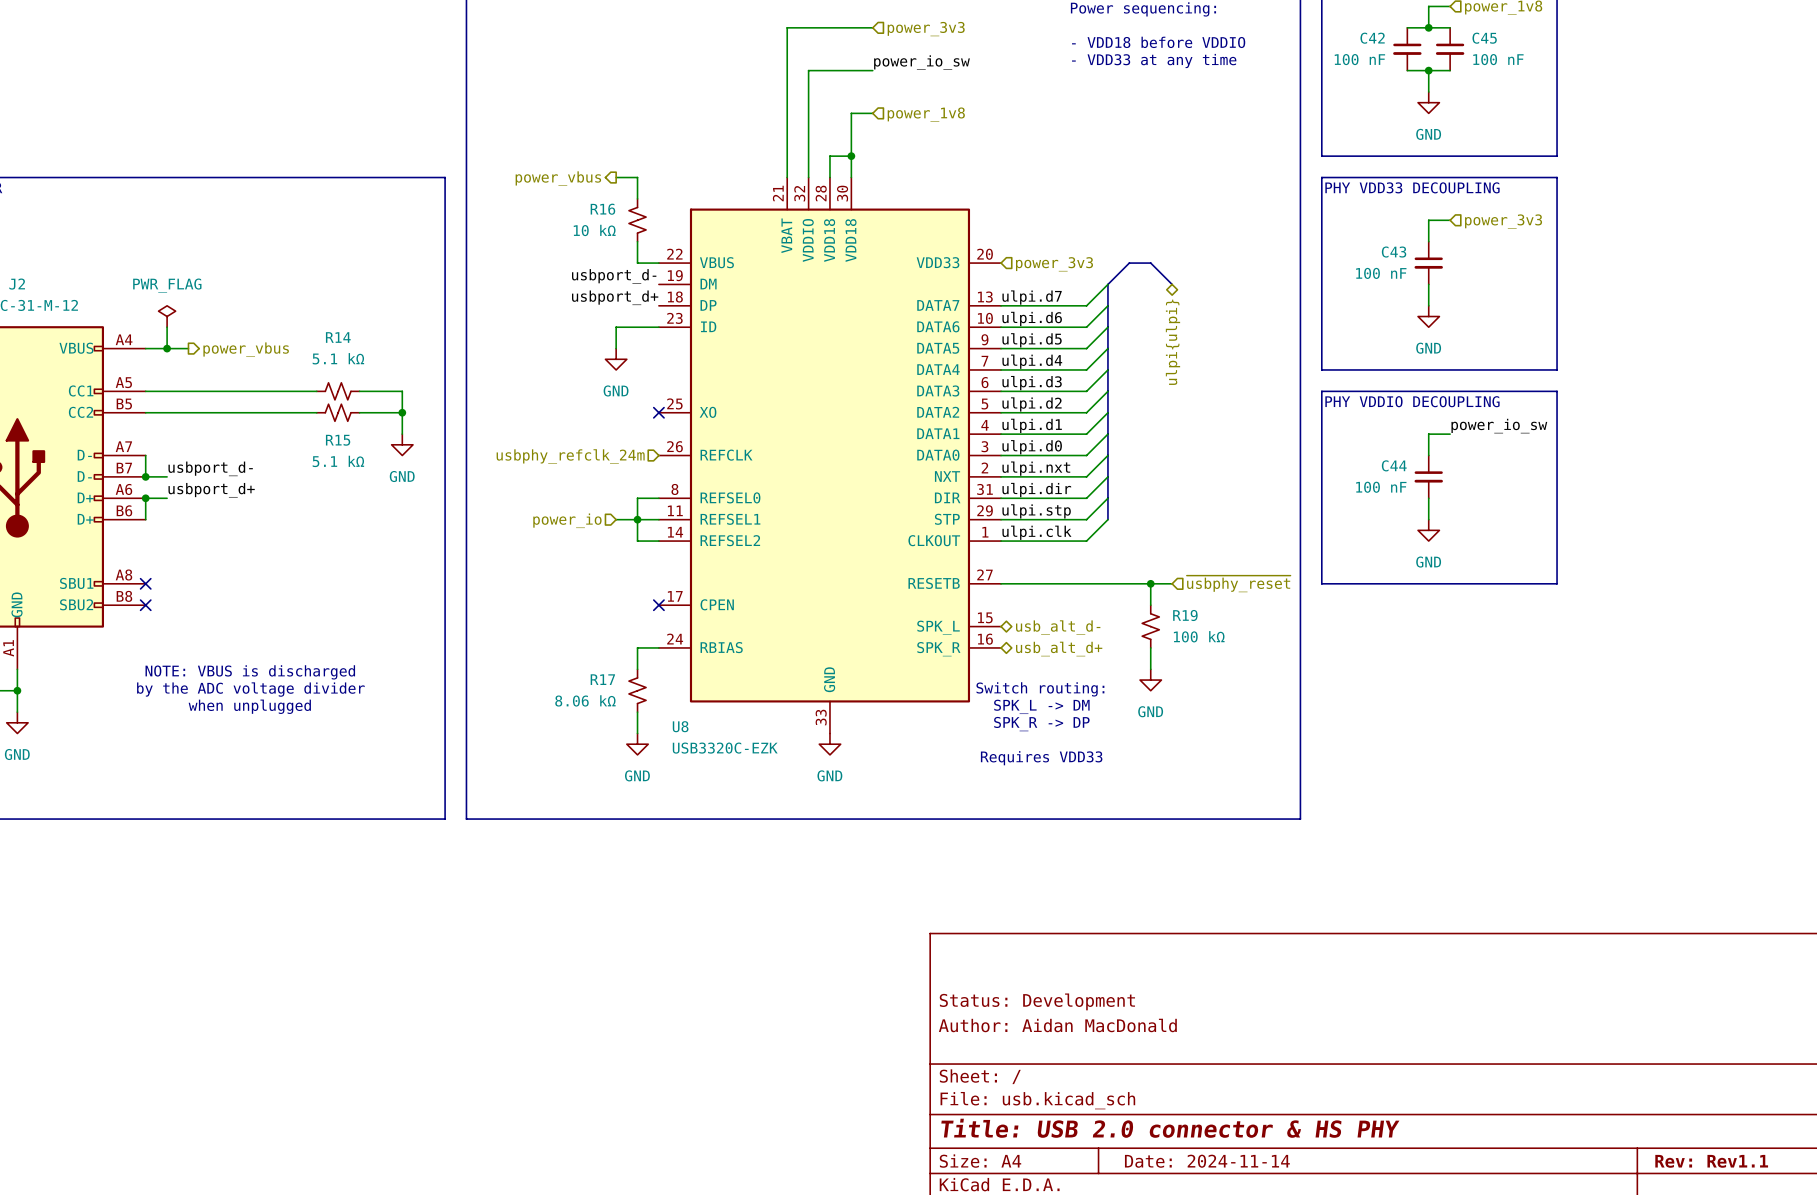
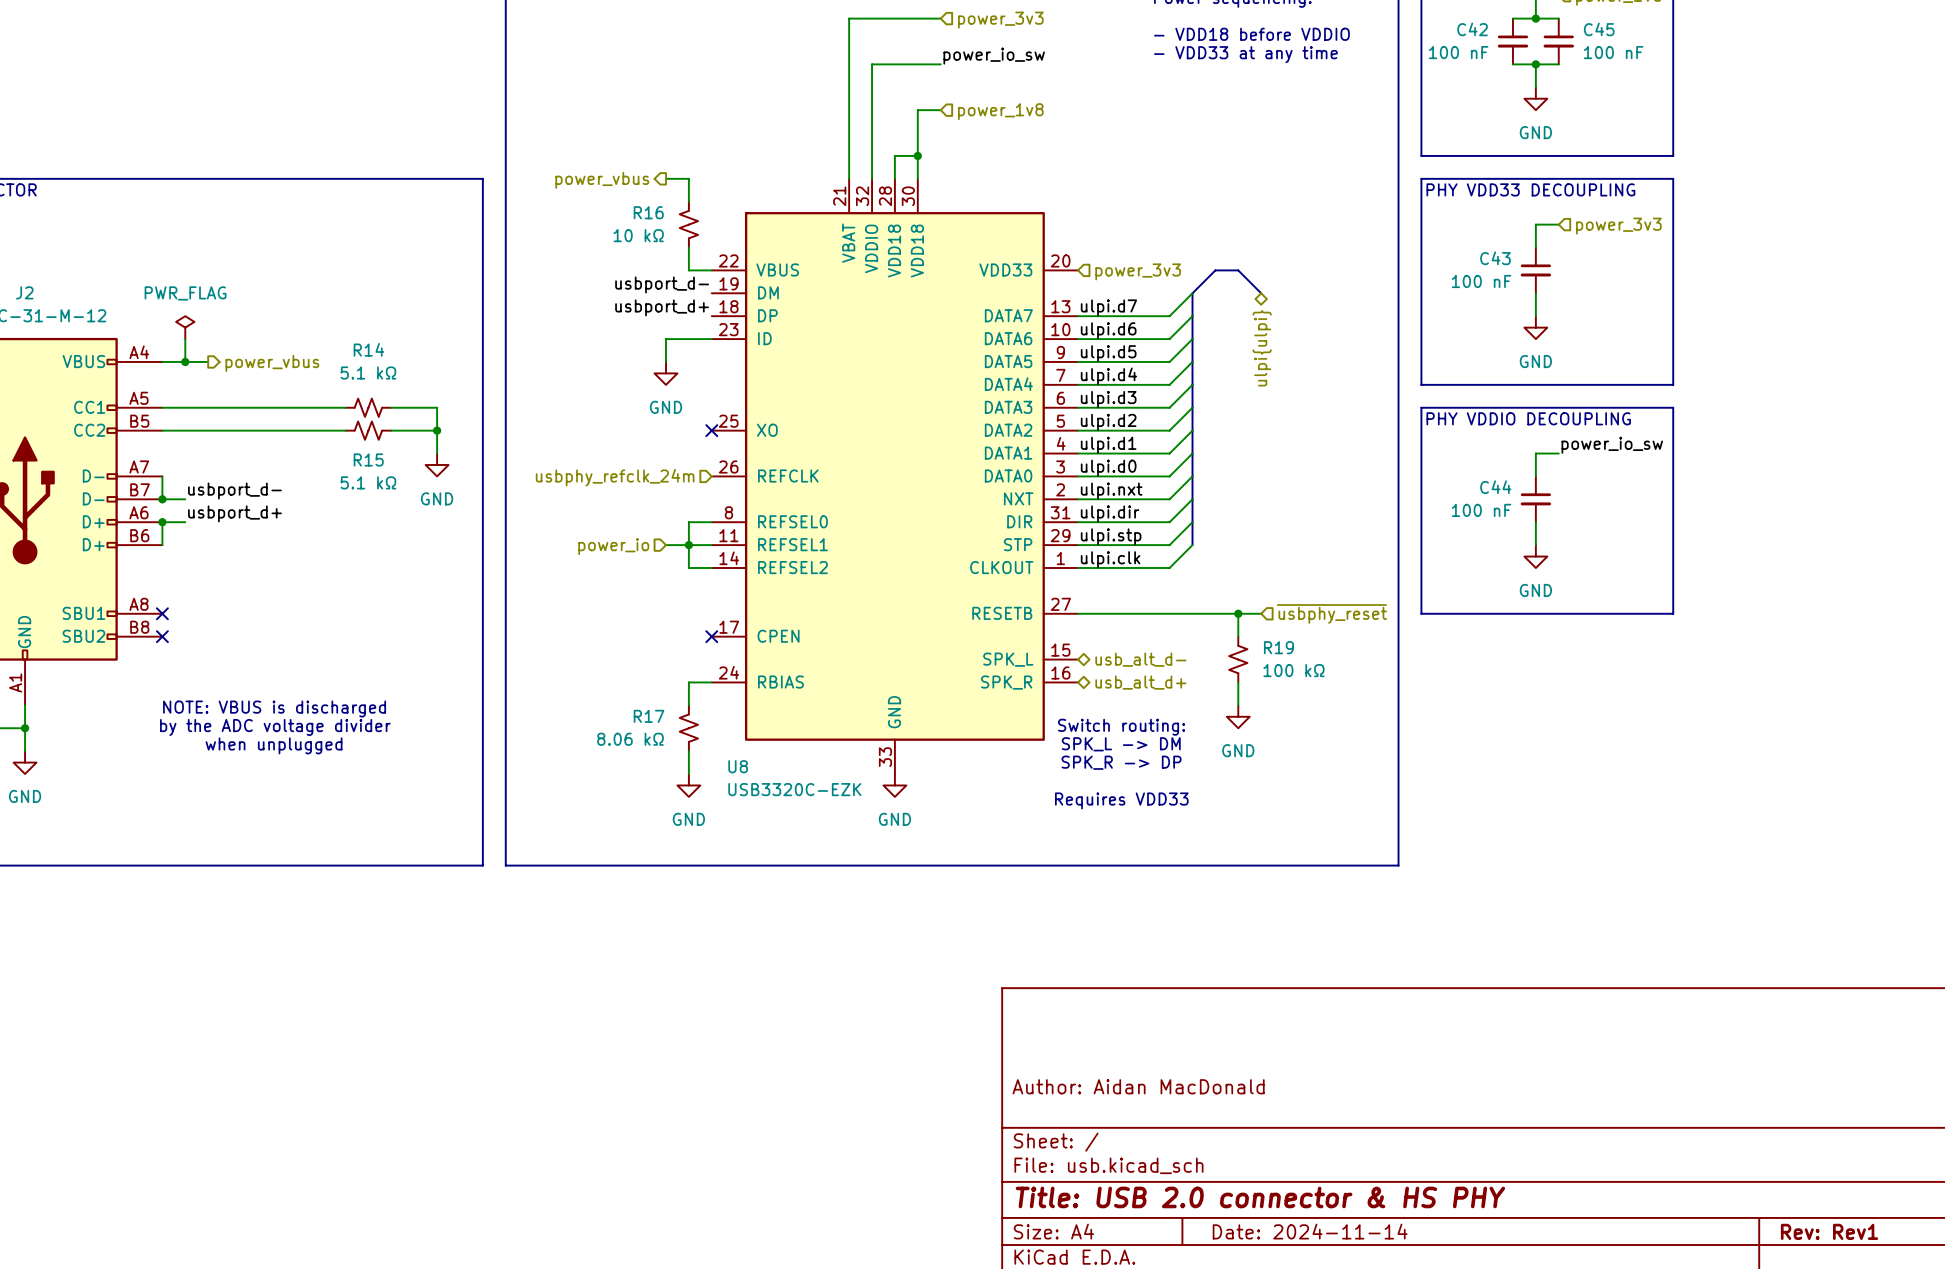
title block: Status: Development (1037, 1001) -> none
title block: Rev: Rev1.1 (1711, 1161) -> Rev: Rev1 (1829, 1231)

